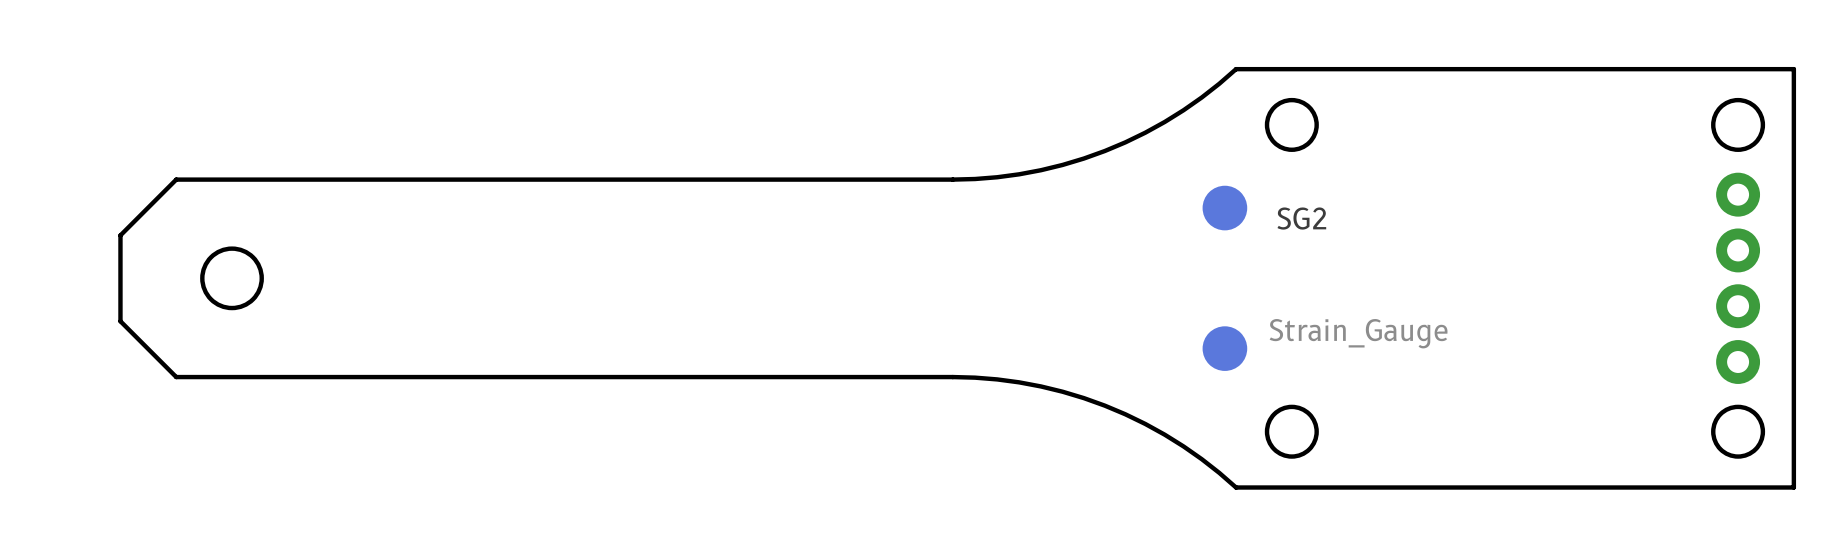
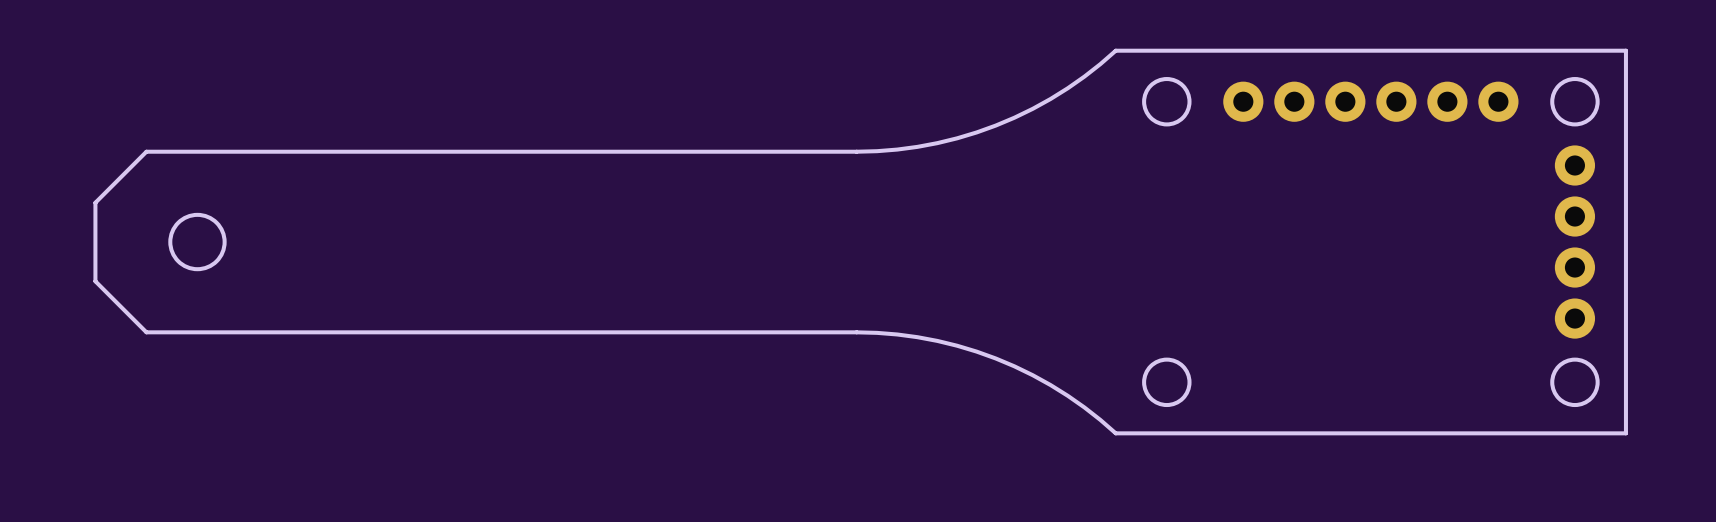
part: none -> (1243, 101)
part: none -> (1294, 101)
part: none -> (1345, 101)
part: none -> (1396, 101)
part: none -> (1447, 101)
part: none -> (1498, 101)
SG2: Strain_Gauge (1224, 278) -> none

